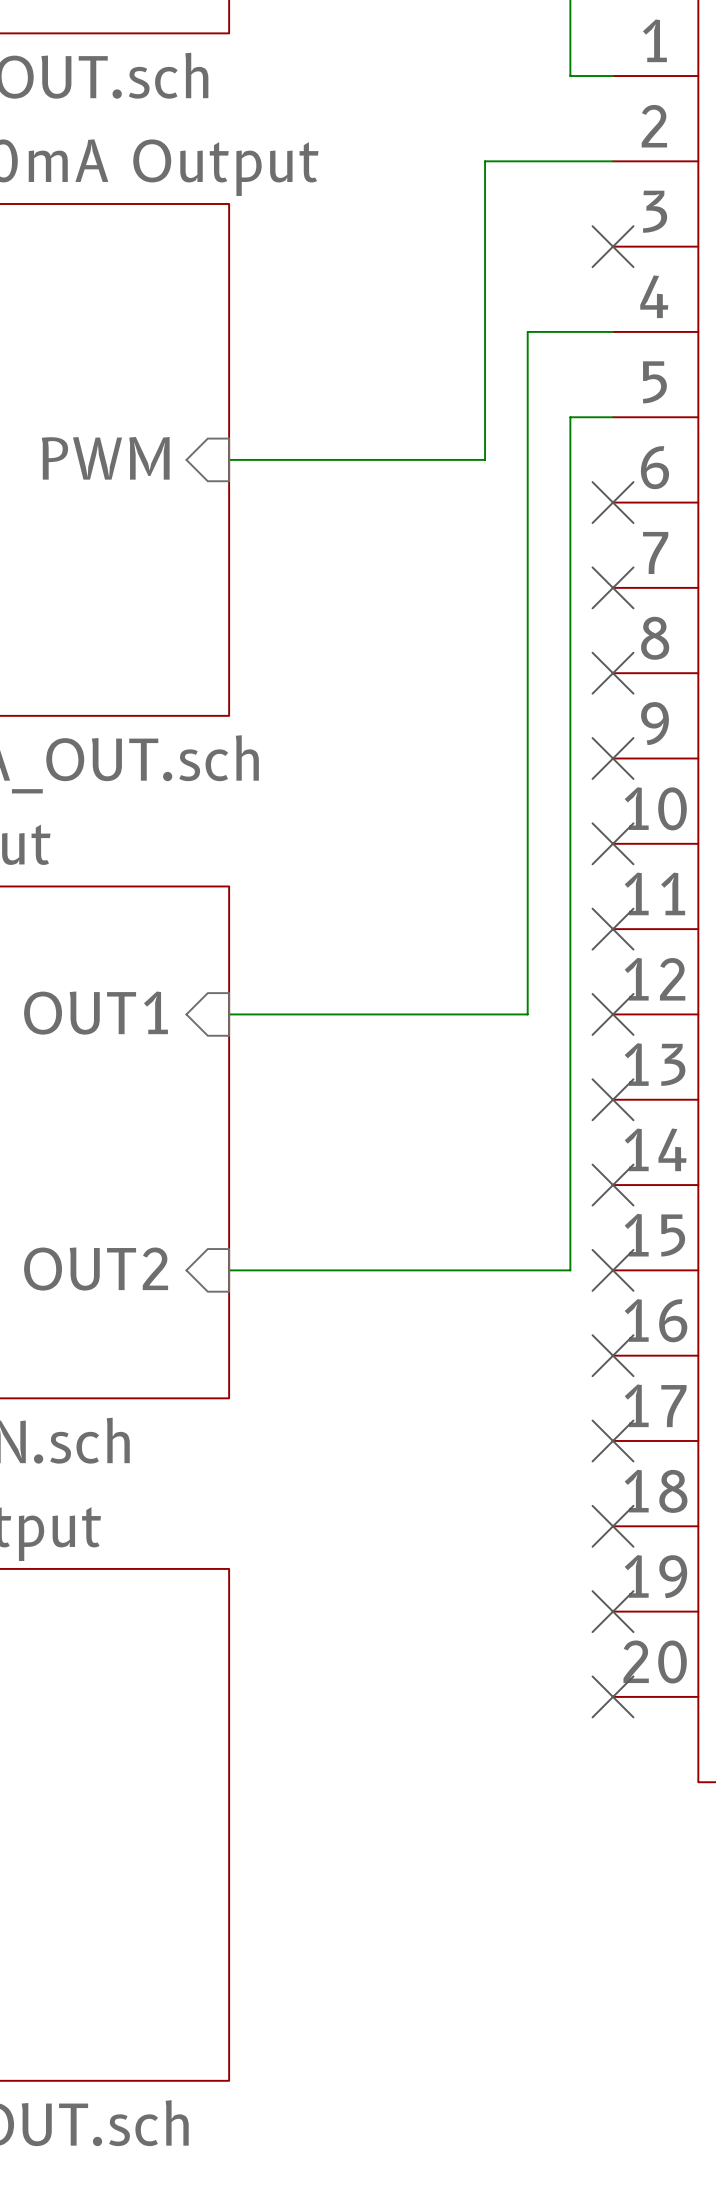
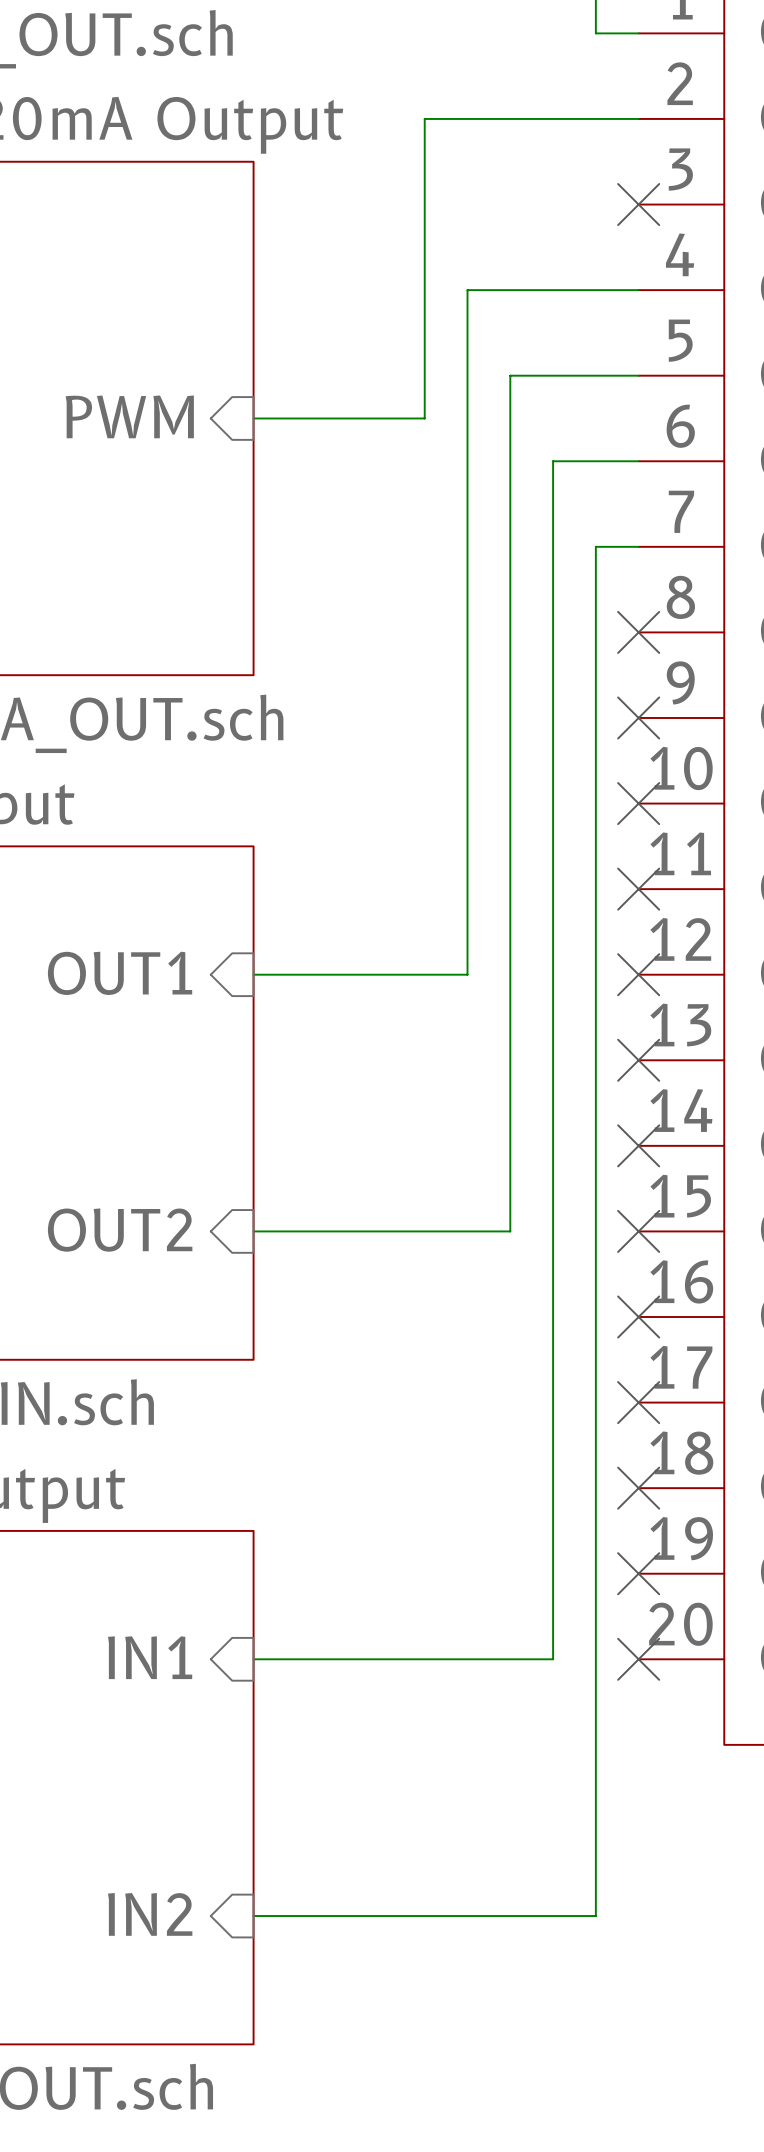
wire: (485, 161) (485, 417) -> (510, 118) (424, 118) (424, 418)
wire: (527, 331) (527, 502) -> (638, 461) (553, 461)
wire: none -> (510, 375) (595, 375)
wire: (570, 417) (570, 587) -> (638, 546) (595, 546)
wire: (399, 459) (485, 459) -> (510, 1231) (510, 418)
no-connect mark: (613, 502) -> none
no-connect mark: (613, 587) -> none
wire: (442, 1014) (527, 1014) -> (467, 974) (467, 290) (553, 290)
wire: none -> (553, 974) (553, 1659) (253, 1659)
wire: (485, 1270) (570, 1270) -> (253, 1916) (595, 1916) (595, 1231)
sheet pin: none -> IN1 (150, 1657)
sheet pin: none -> IN2 (150, 1914)

